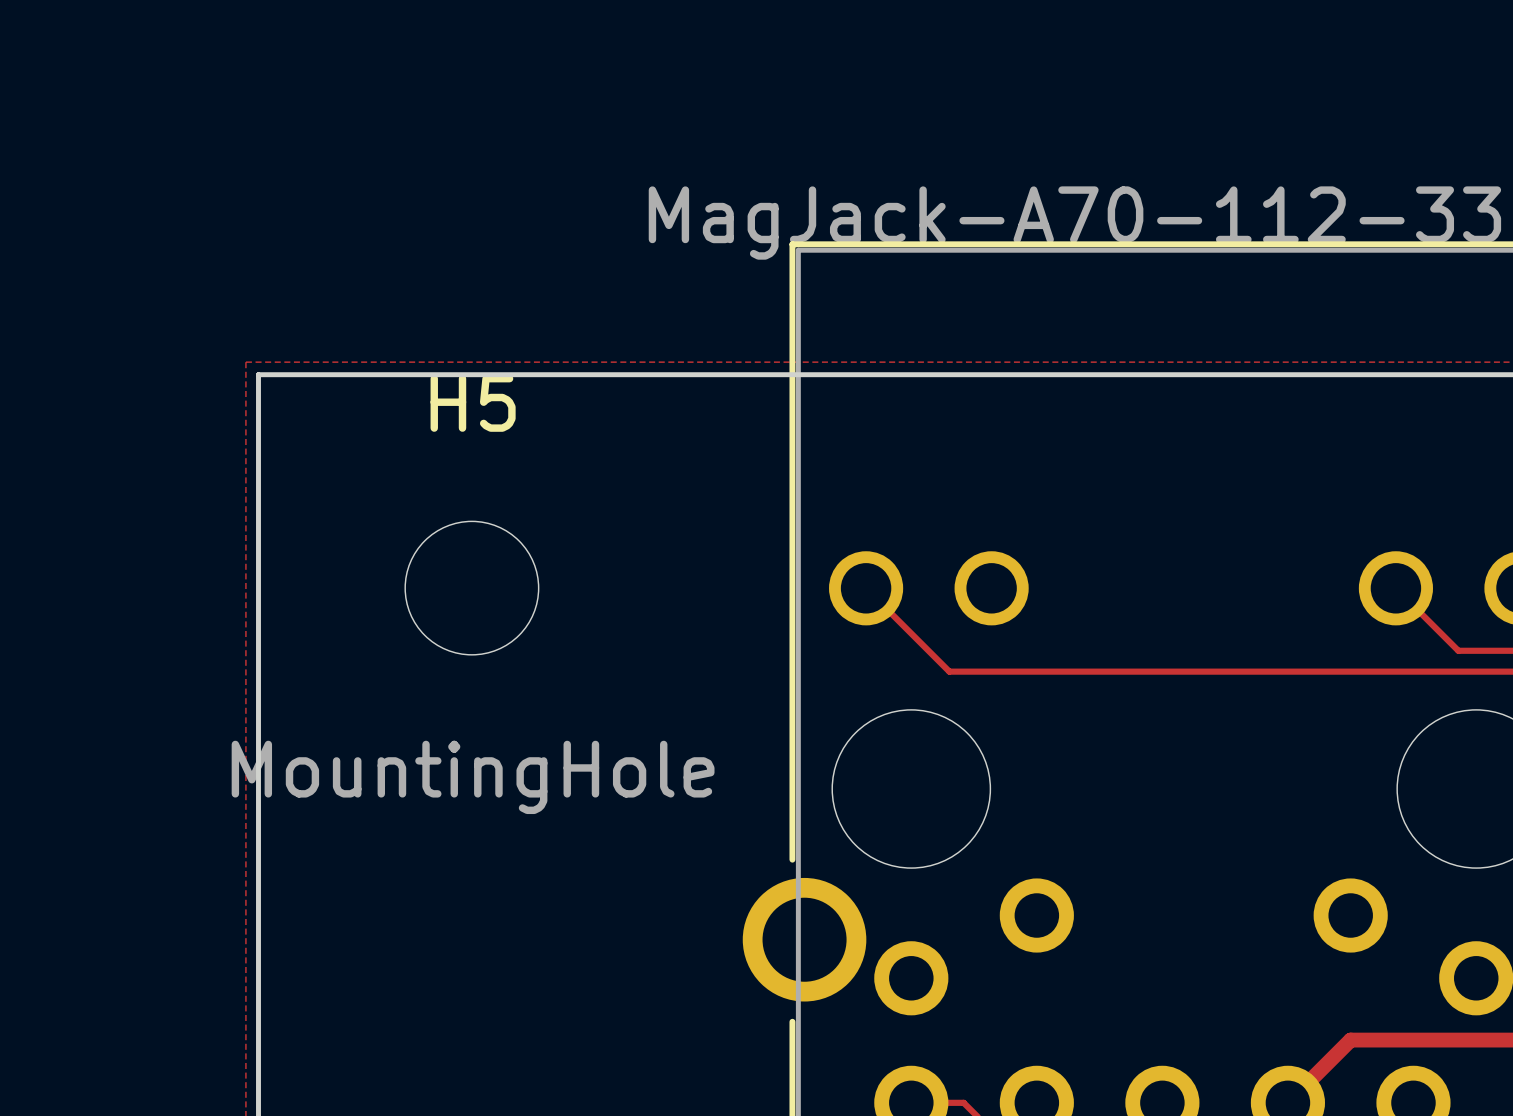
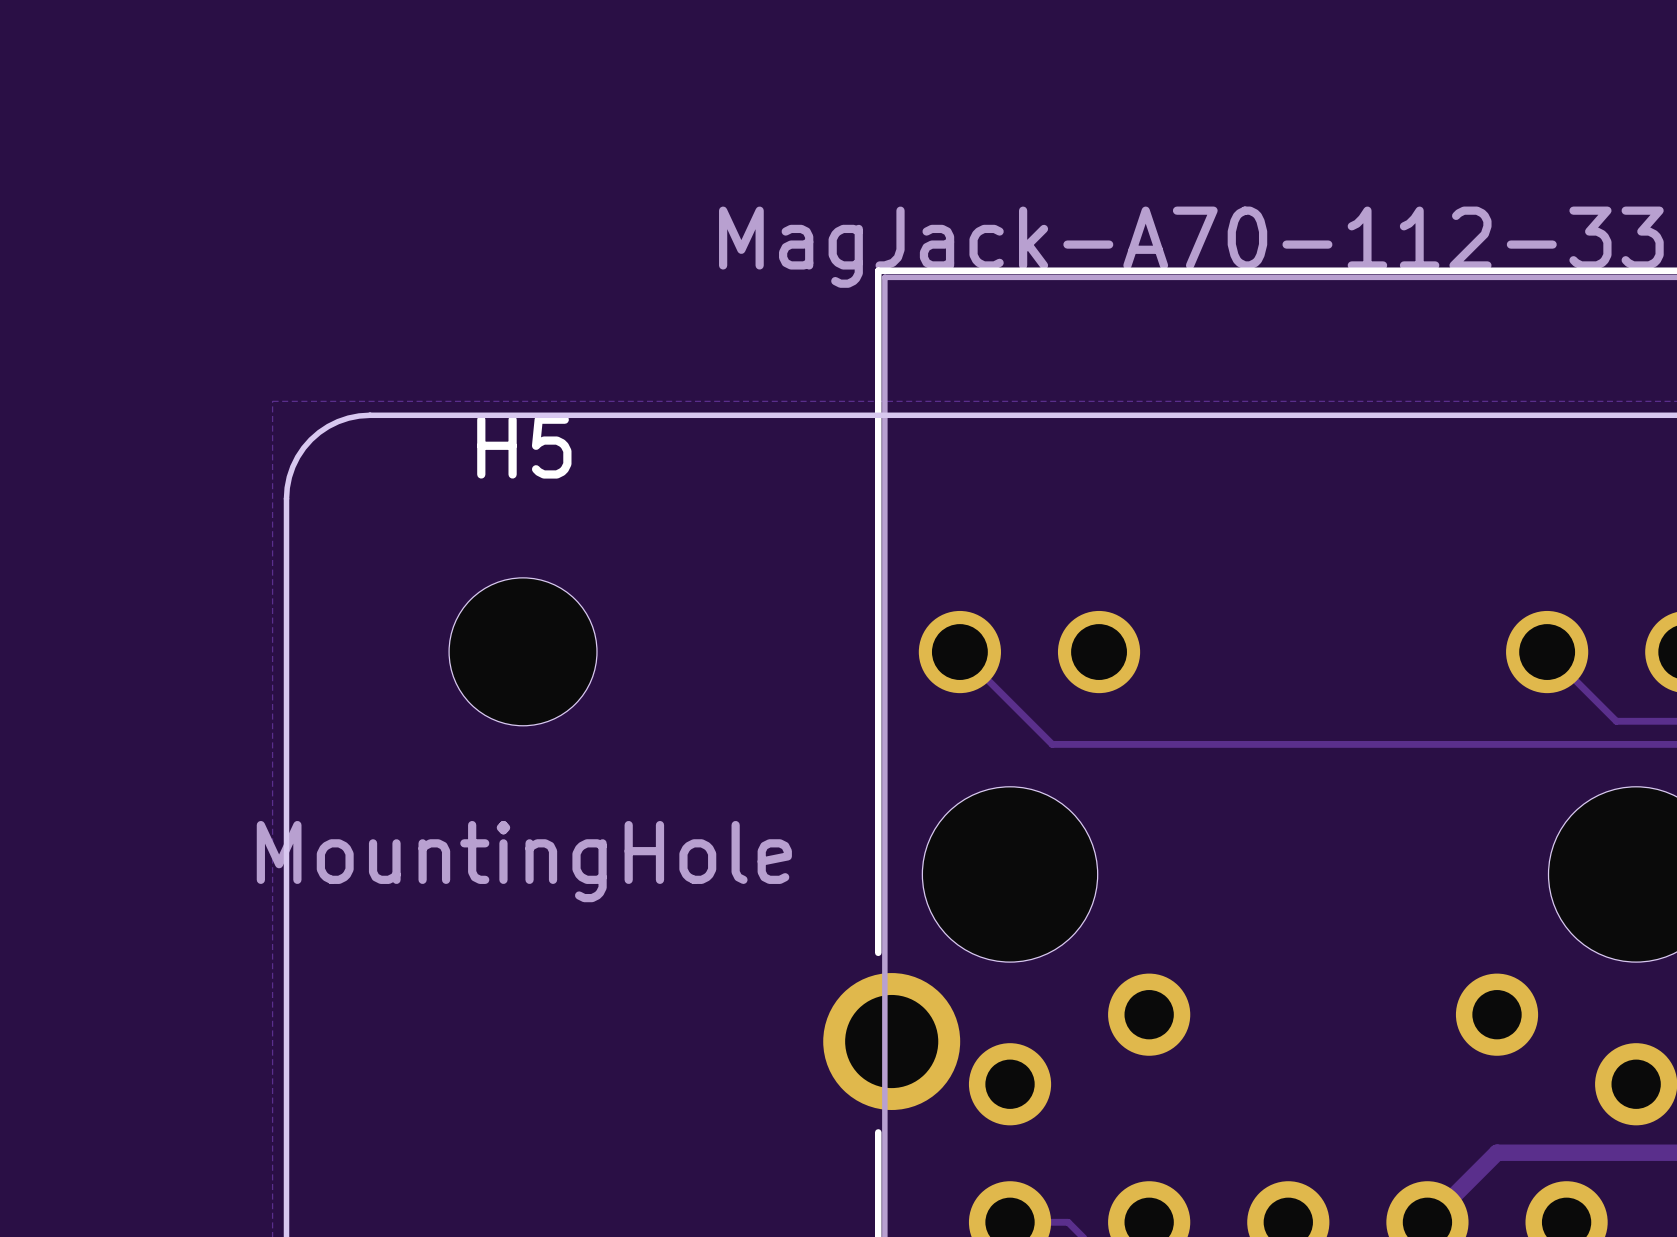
board edge: (333, 374) (258, 374) (258, 450) -> (369, 415) (338, 421) (310, 439) (292, 466) (286, 498)

